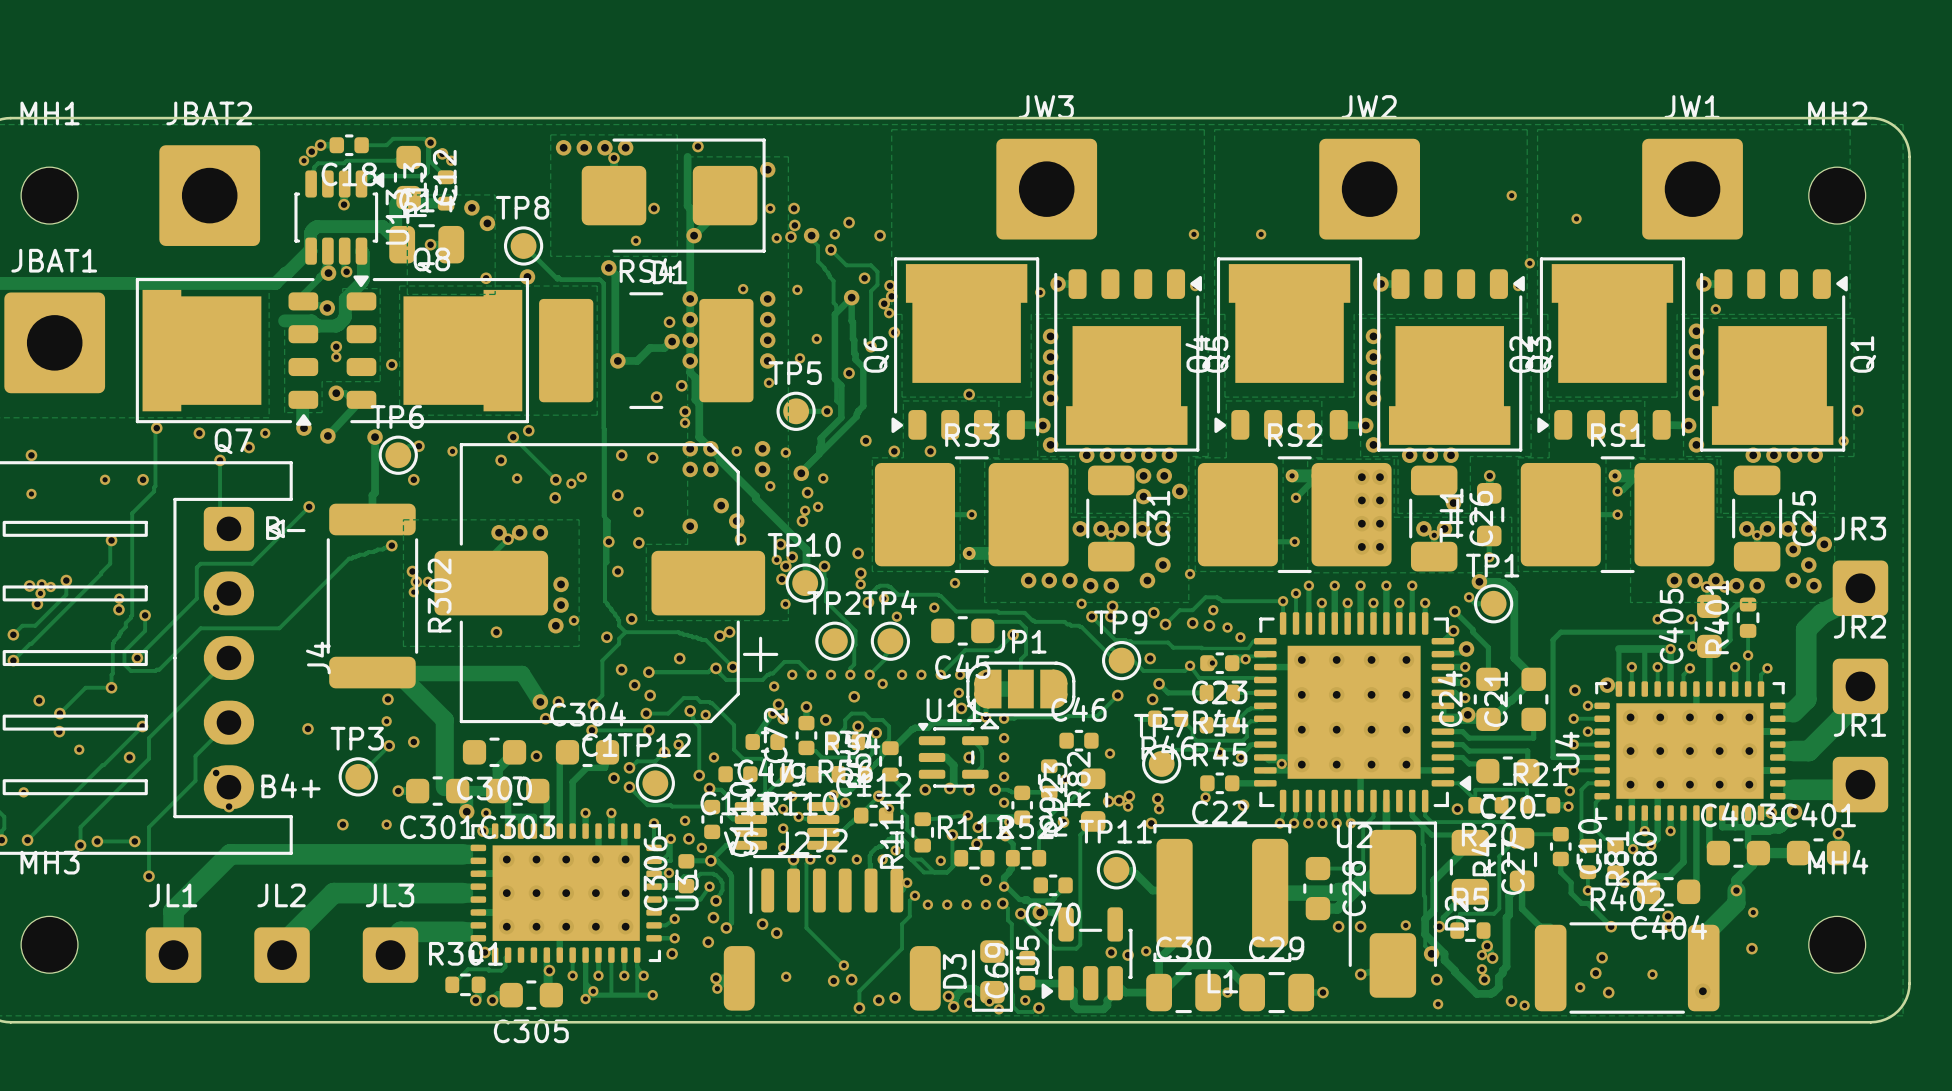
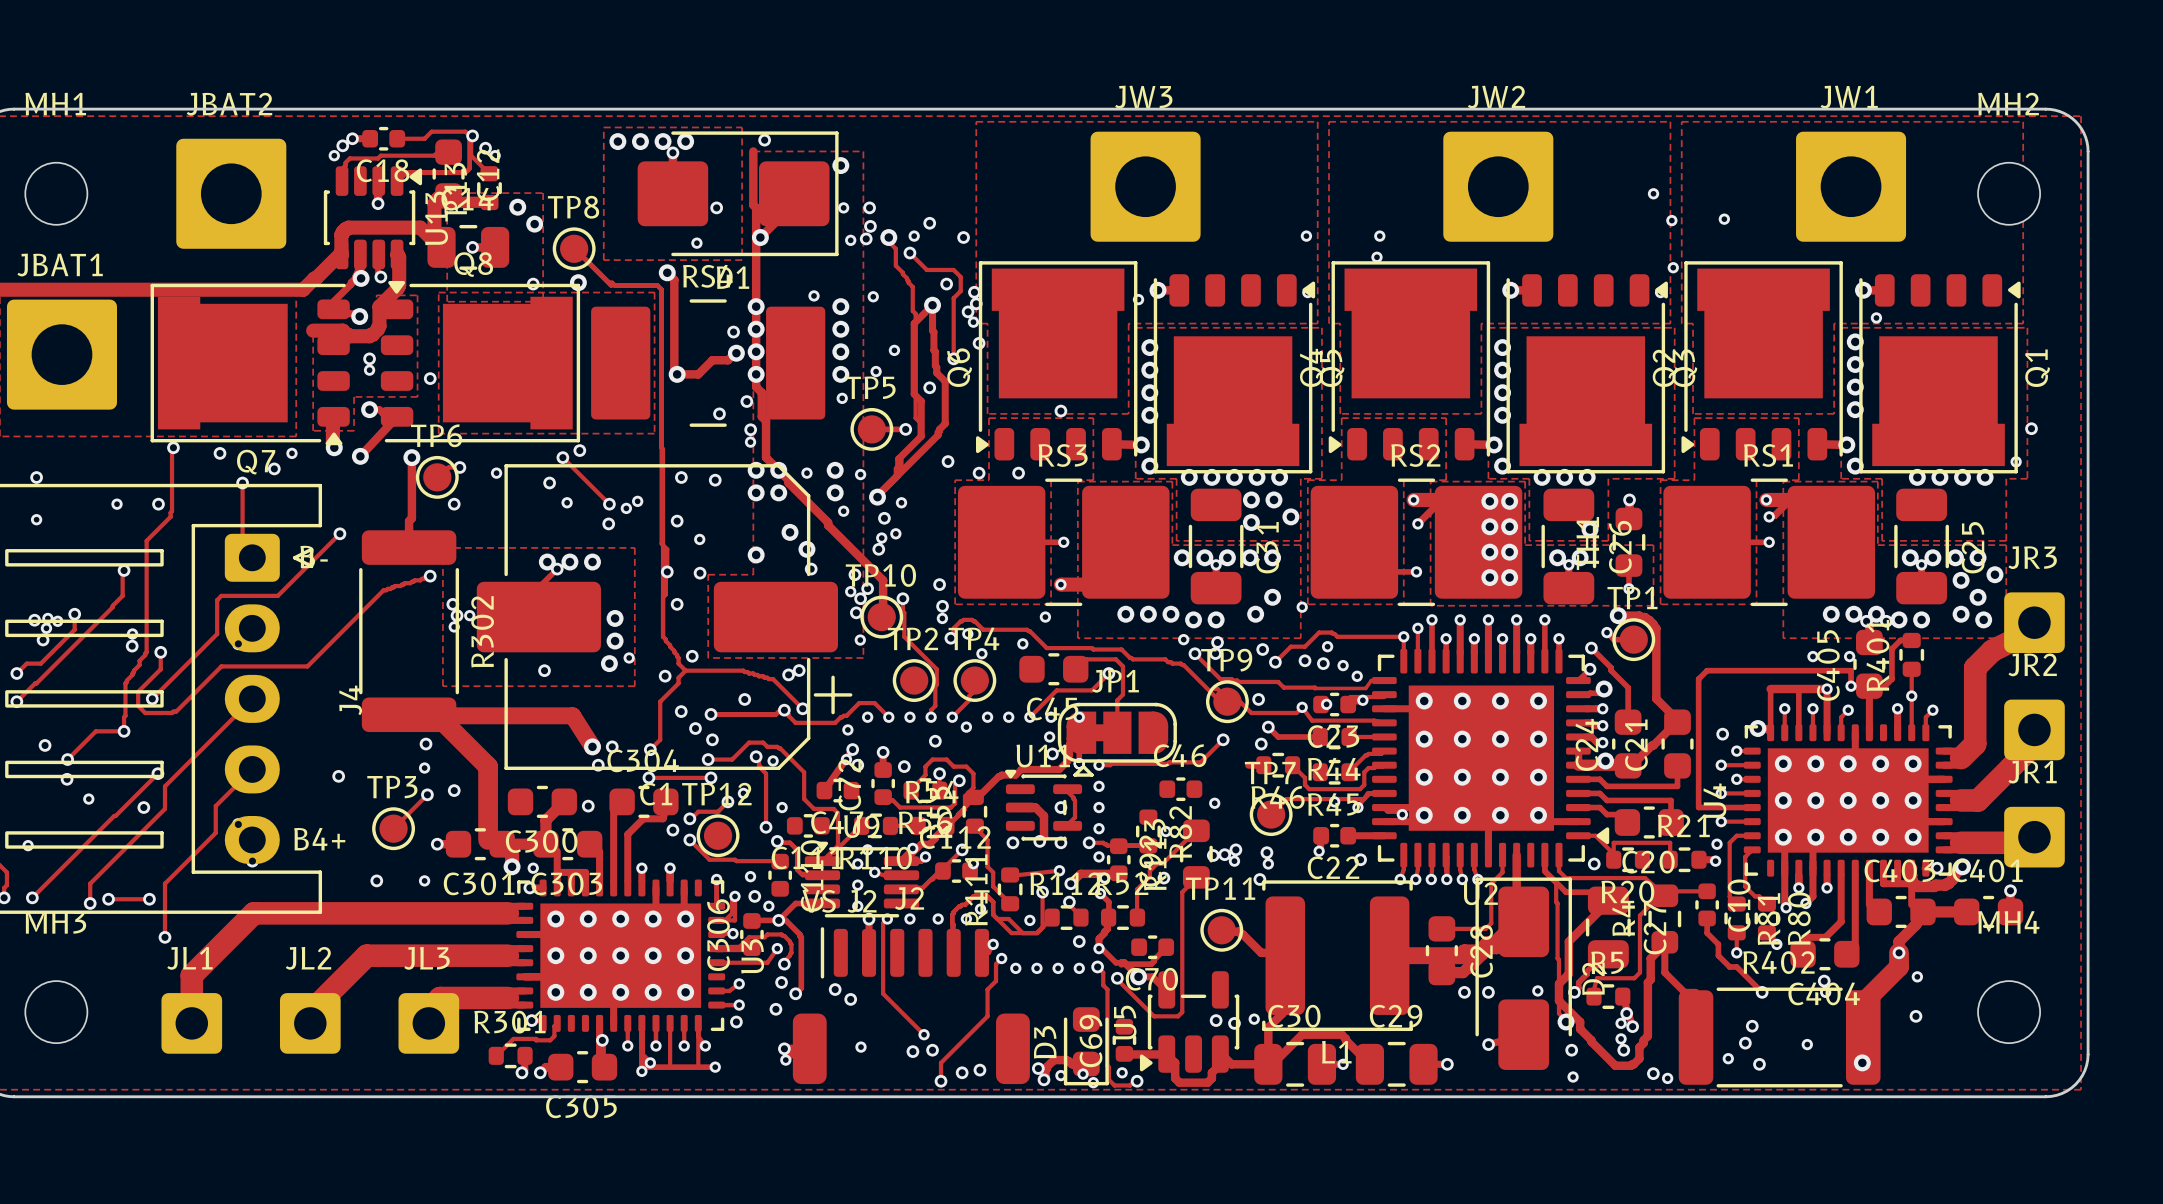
via: none -> (1671, 220)
via: none -> (1376, 257)

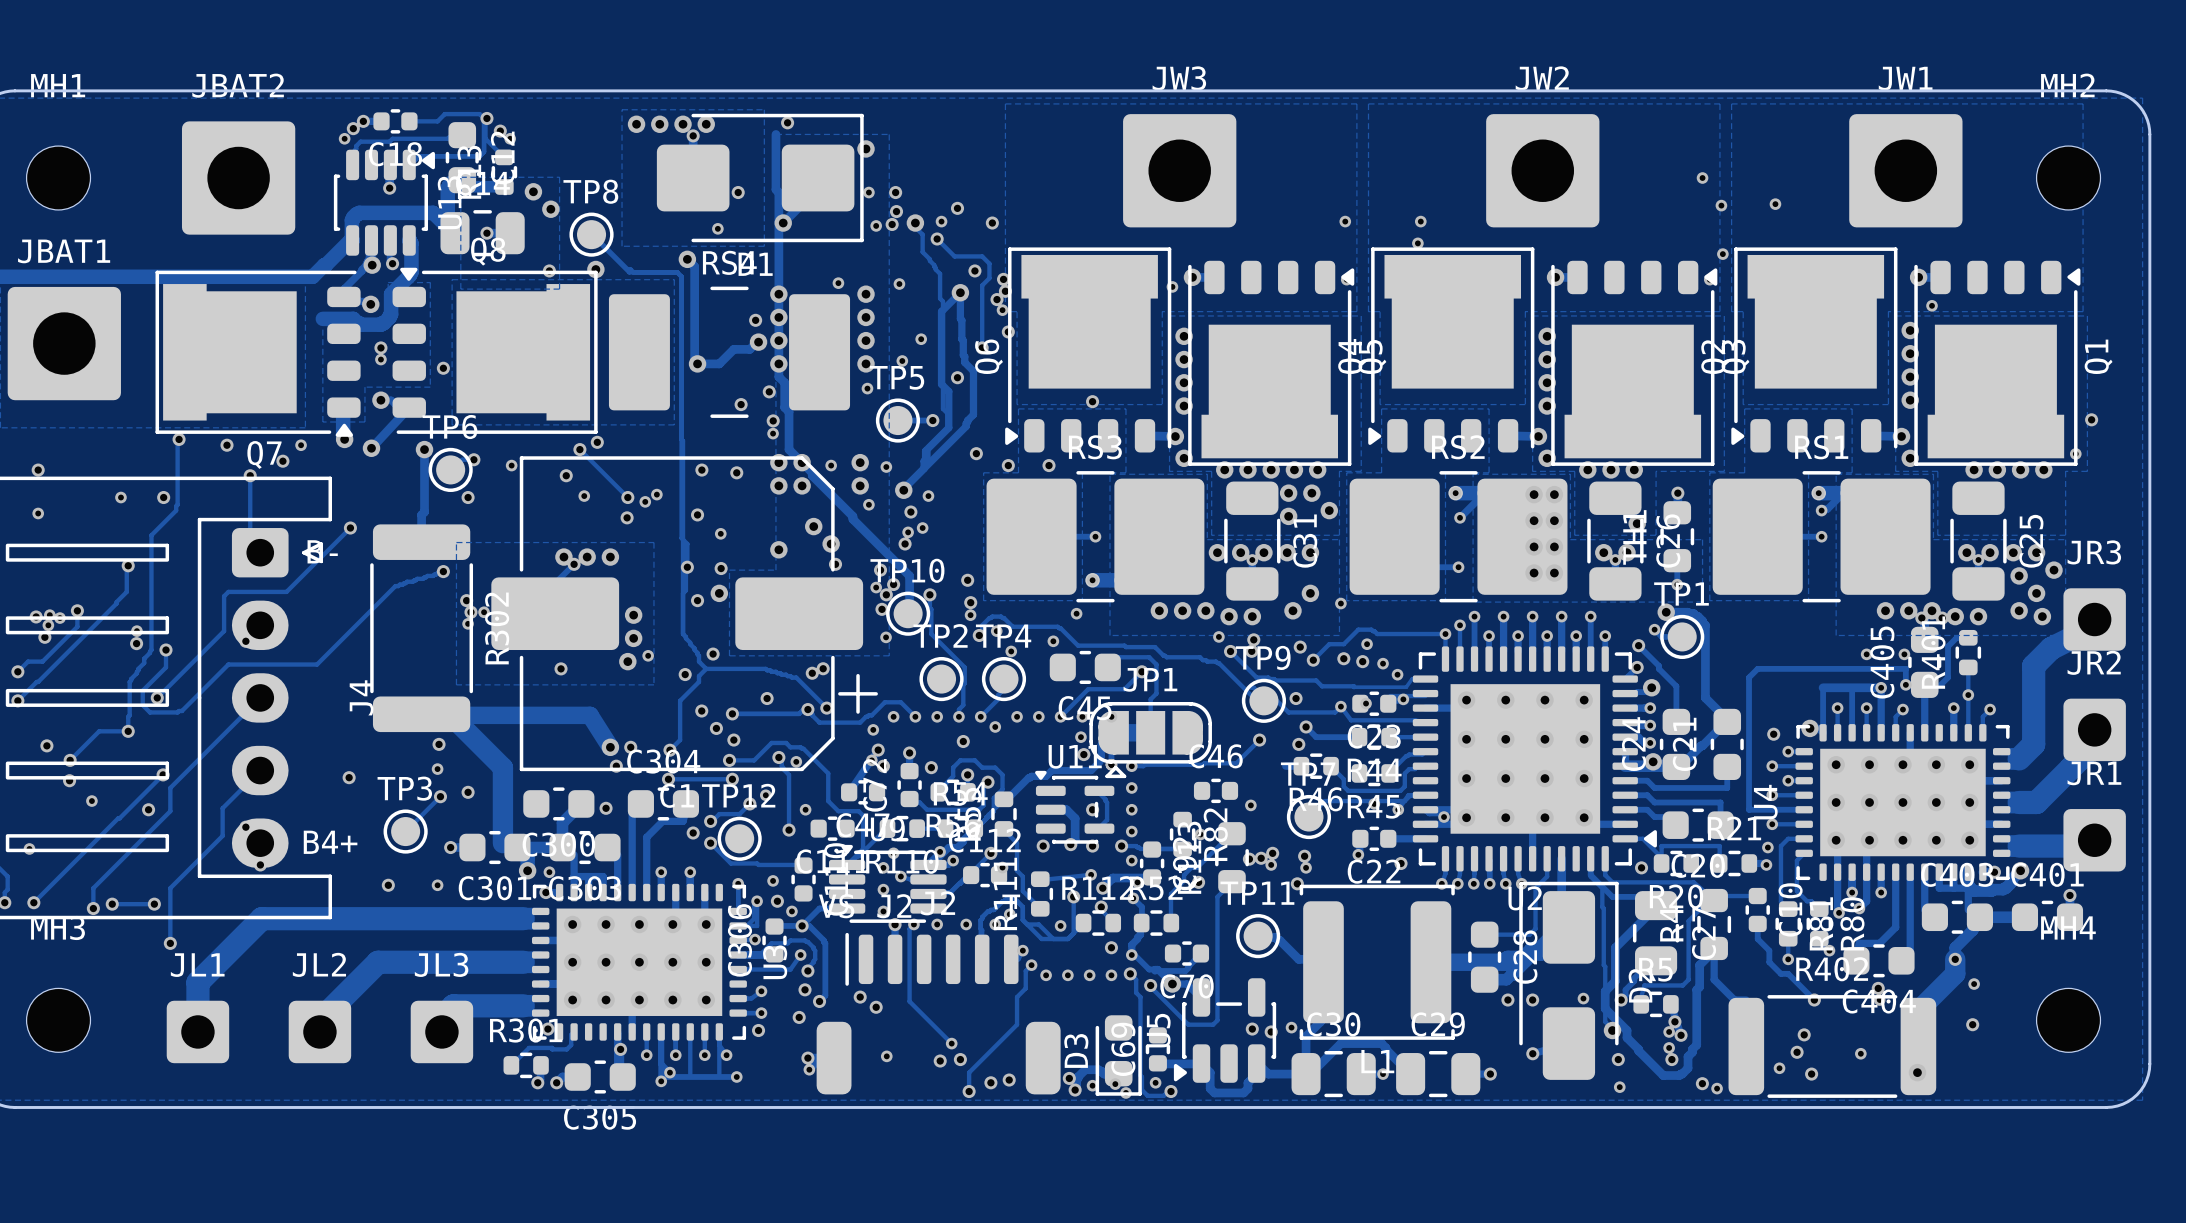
via: none -> (719, 593)
via: (777, 841) -> none
track: (782, 842) (781, 841) (777, 841) (778, 842) (790, 842) (797, 849) (797, 869) (802, 875) (822, 875) (801, 873) -> none

